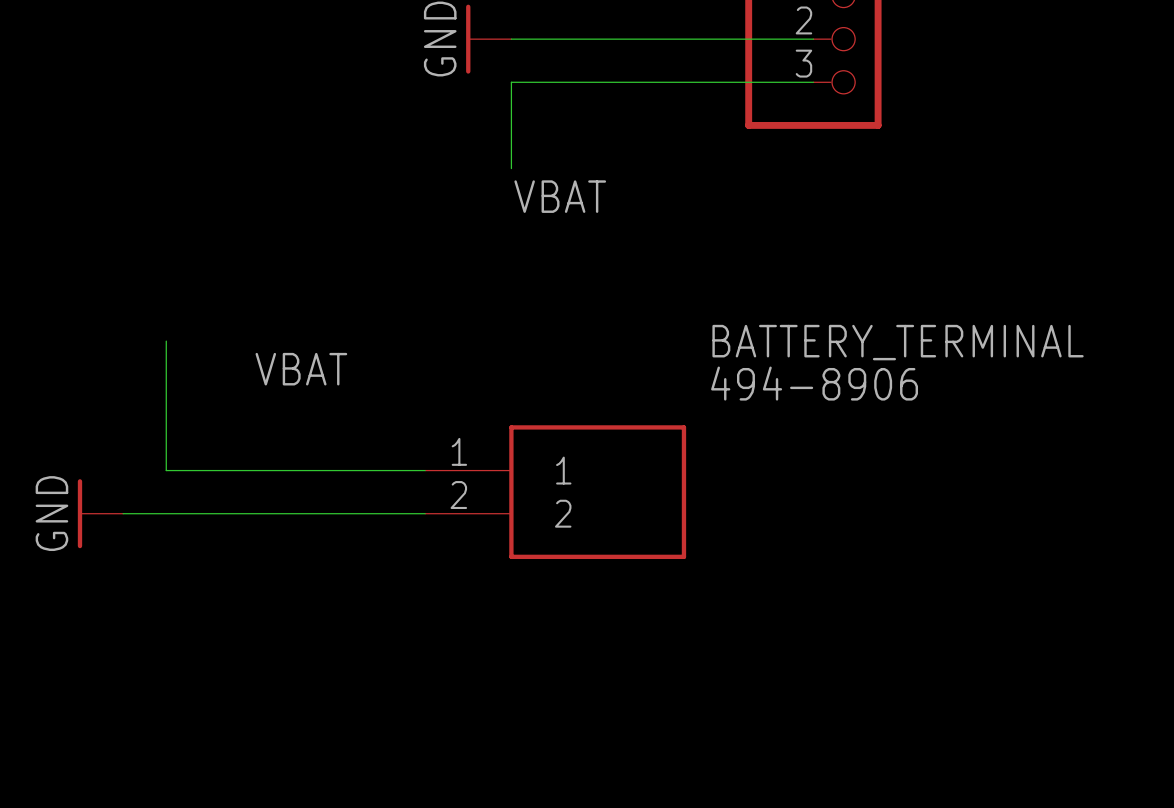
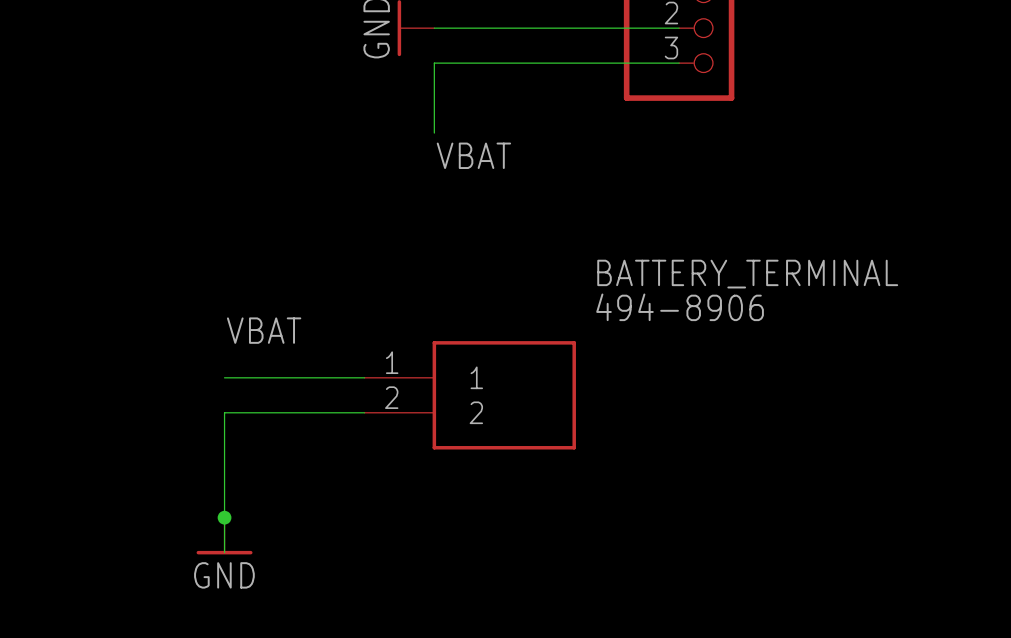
wire: (166, 341) (166, 470) (252, 470) -> none
label position: VBAT (301, 369) -> VBAT (264, 330)
power symbol rotation: 0° (79, 513) -> 90° counterclockwise (224, 552)
power symbol position: GND (100, 513) -> GND (224, 536)
wire: (123, 513) (252, 513) -> (224, 552) (224, 412)
junction: none -> (224, 517)

